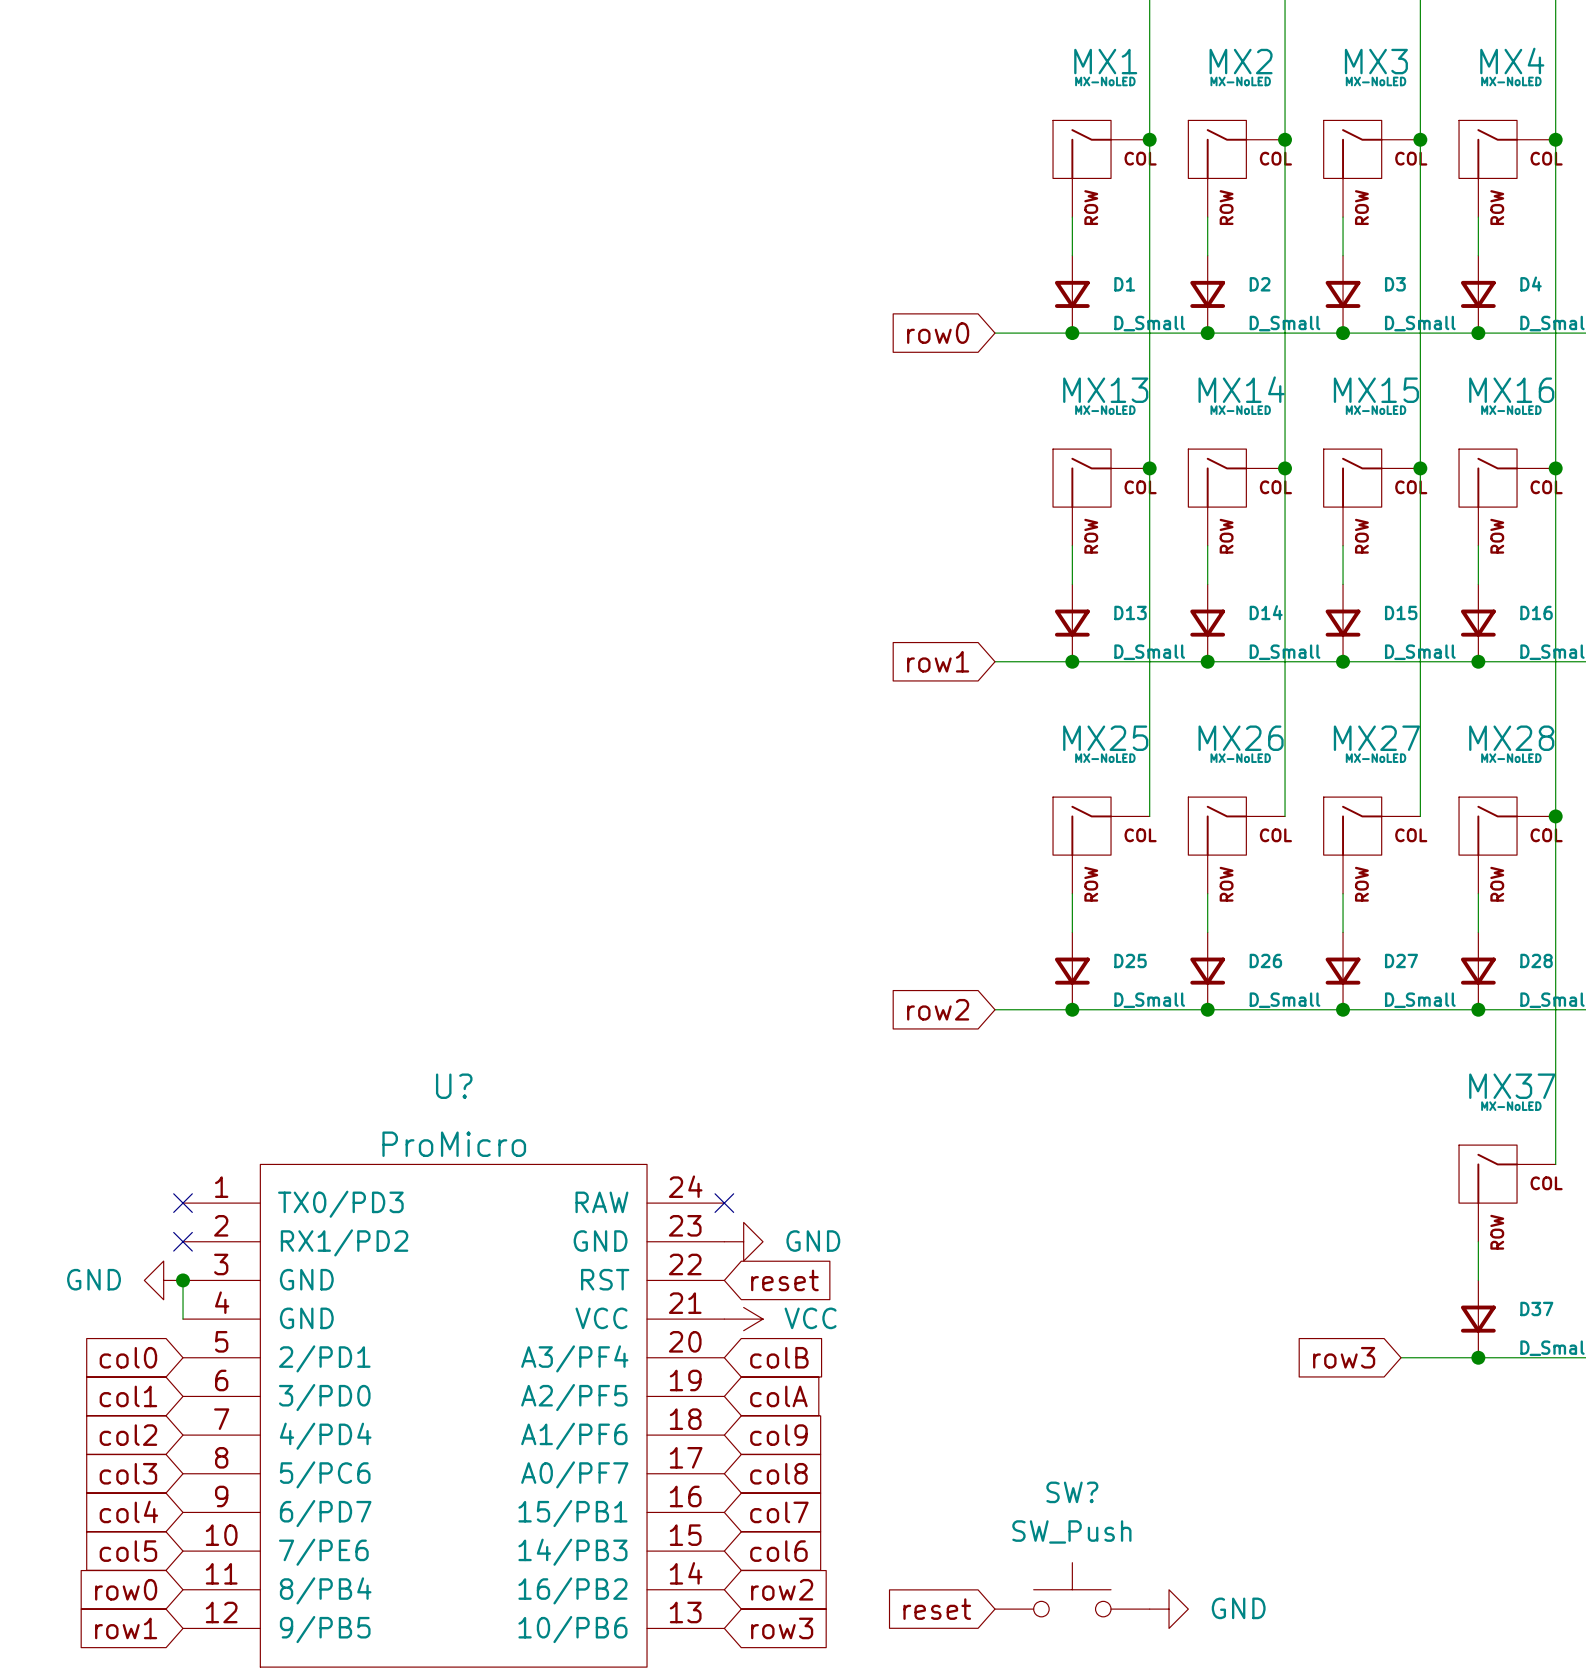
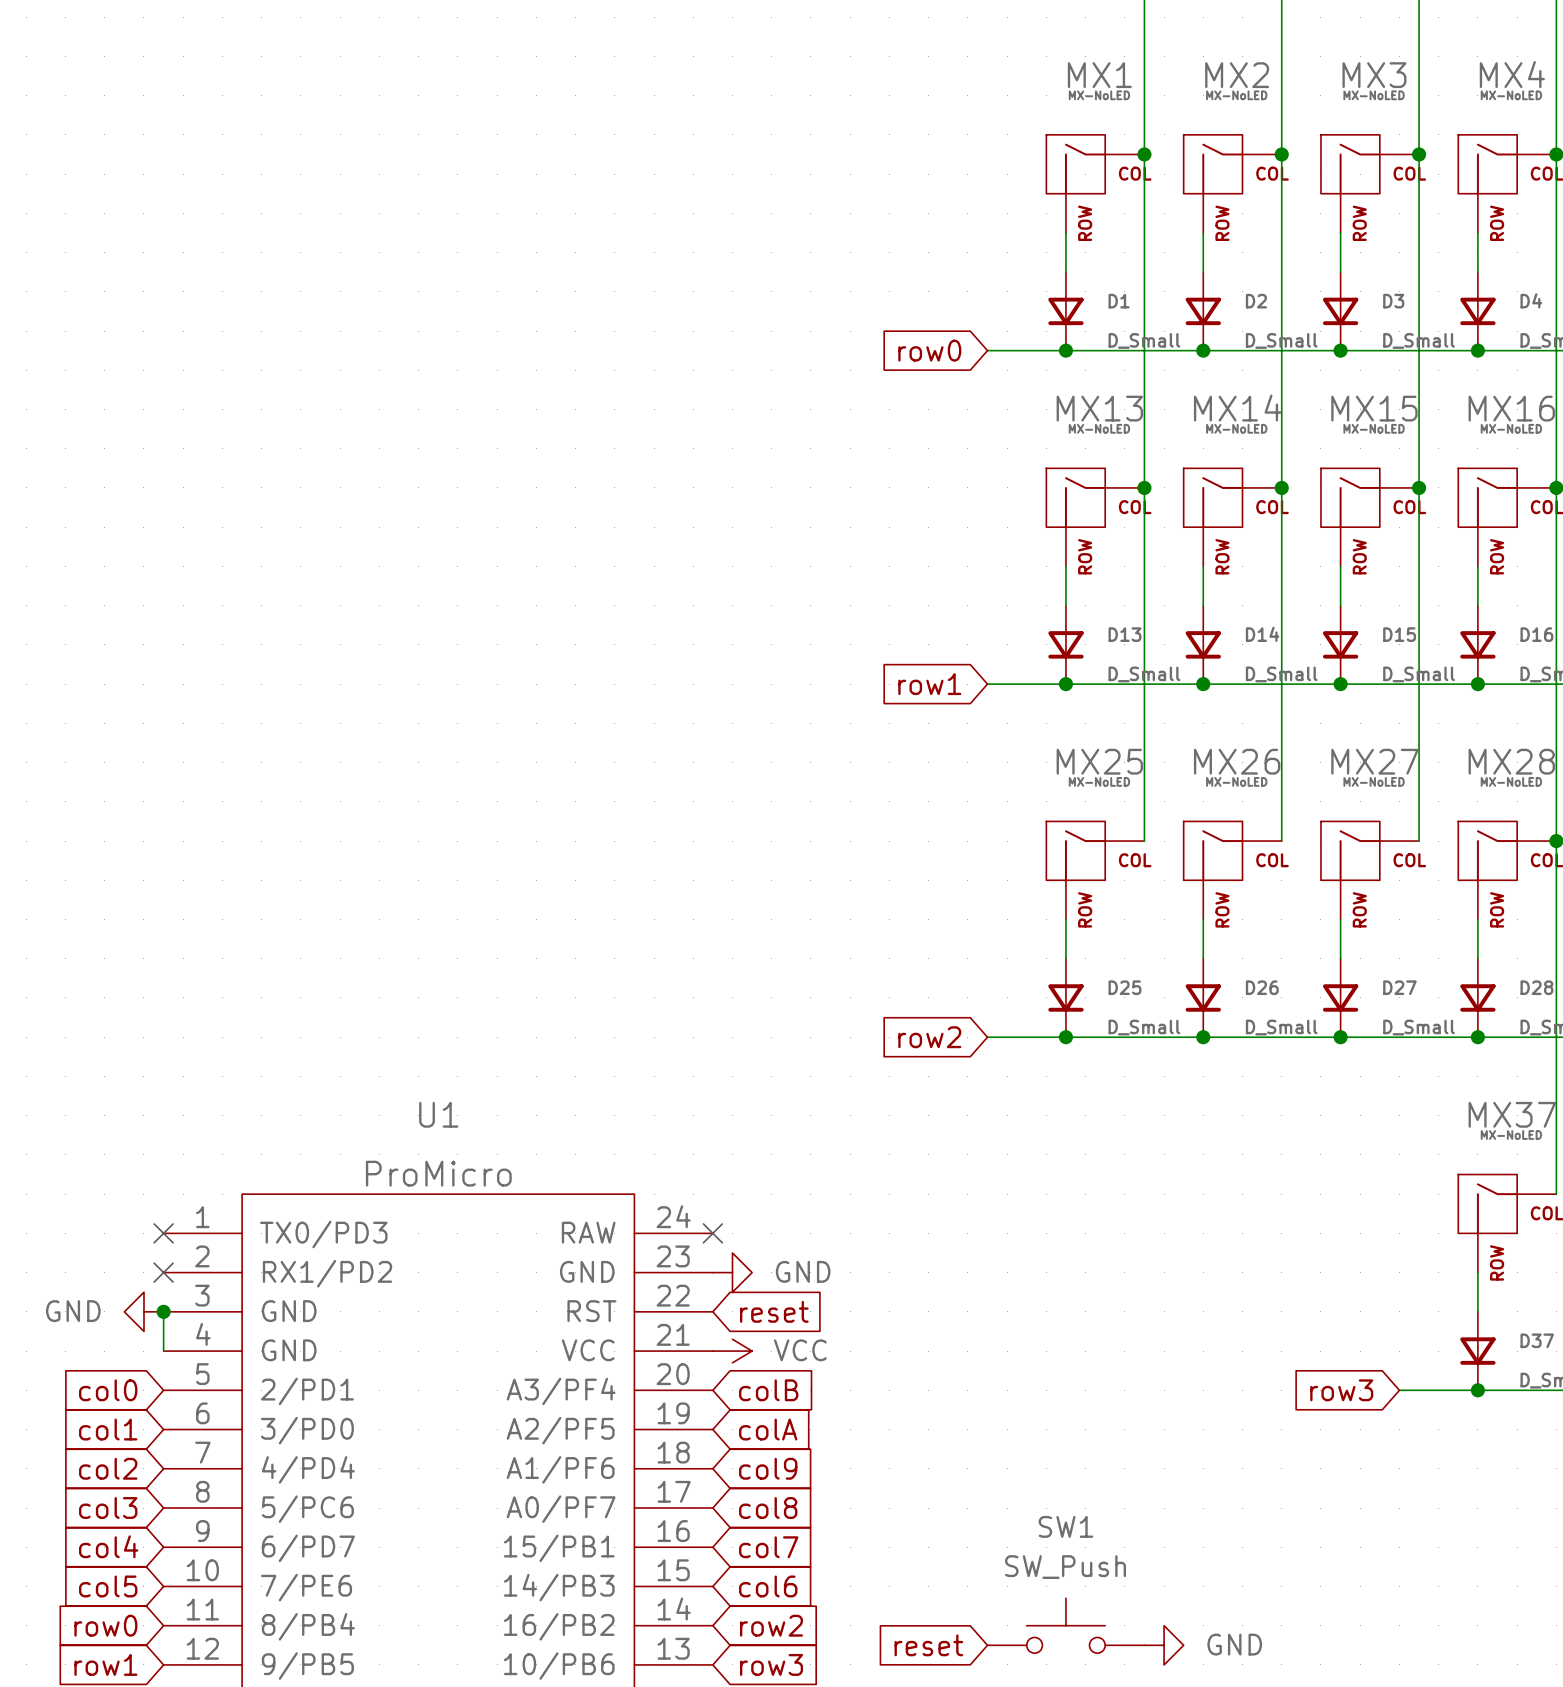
U? name: U? (454, 1086) -> U1 (438, 1114)
SW? name: SW? (1072, 1492) -> SW1 (1065, 1526)

